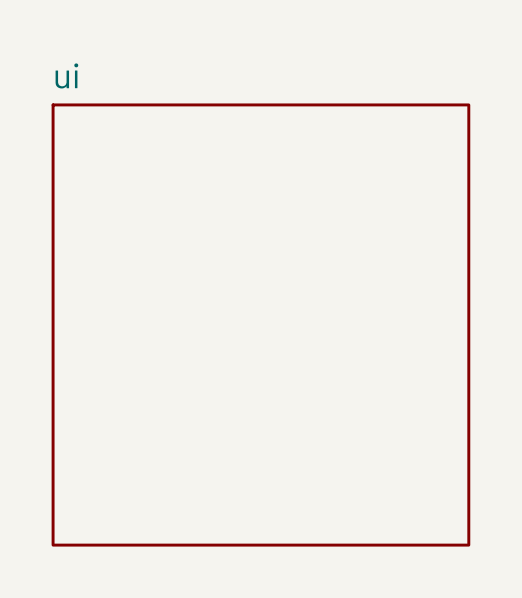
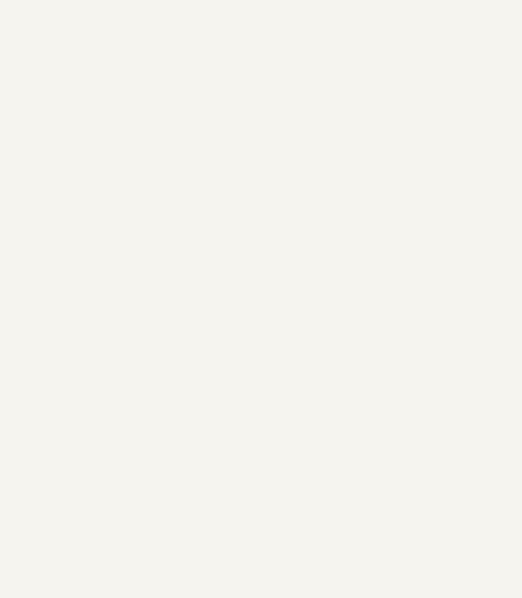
sheet ui: (260, 325) -> none

